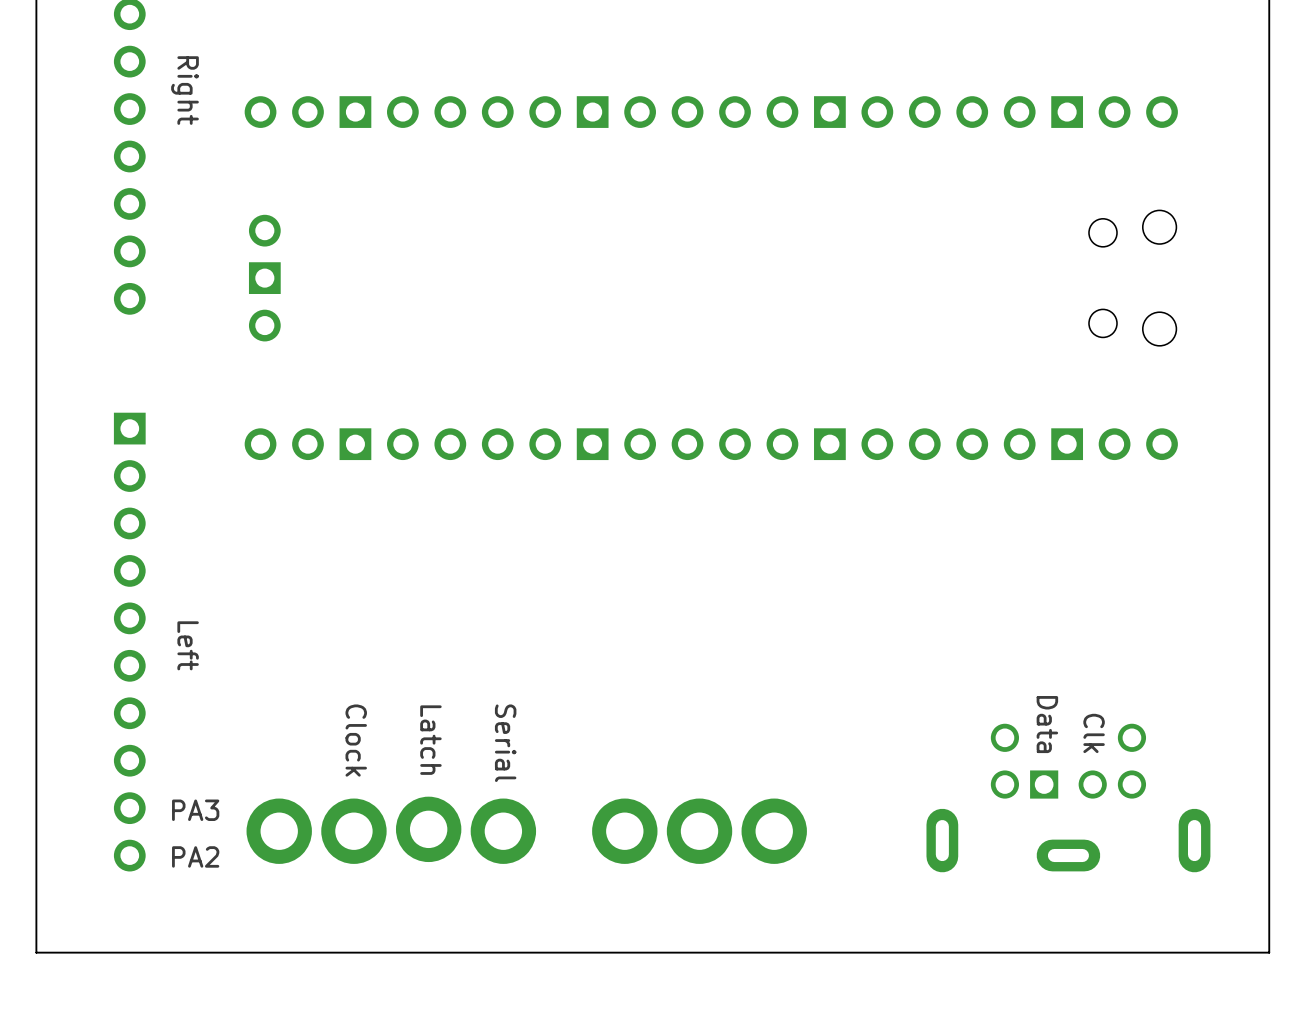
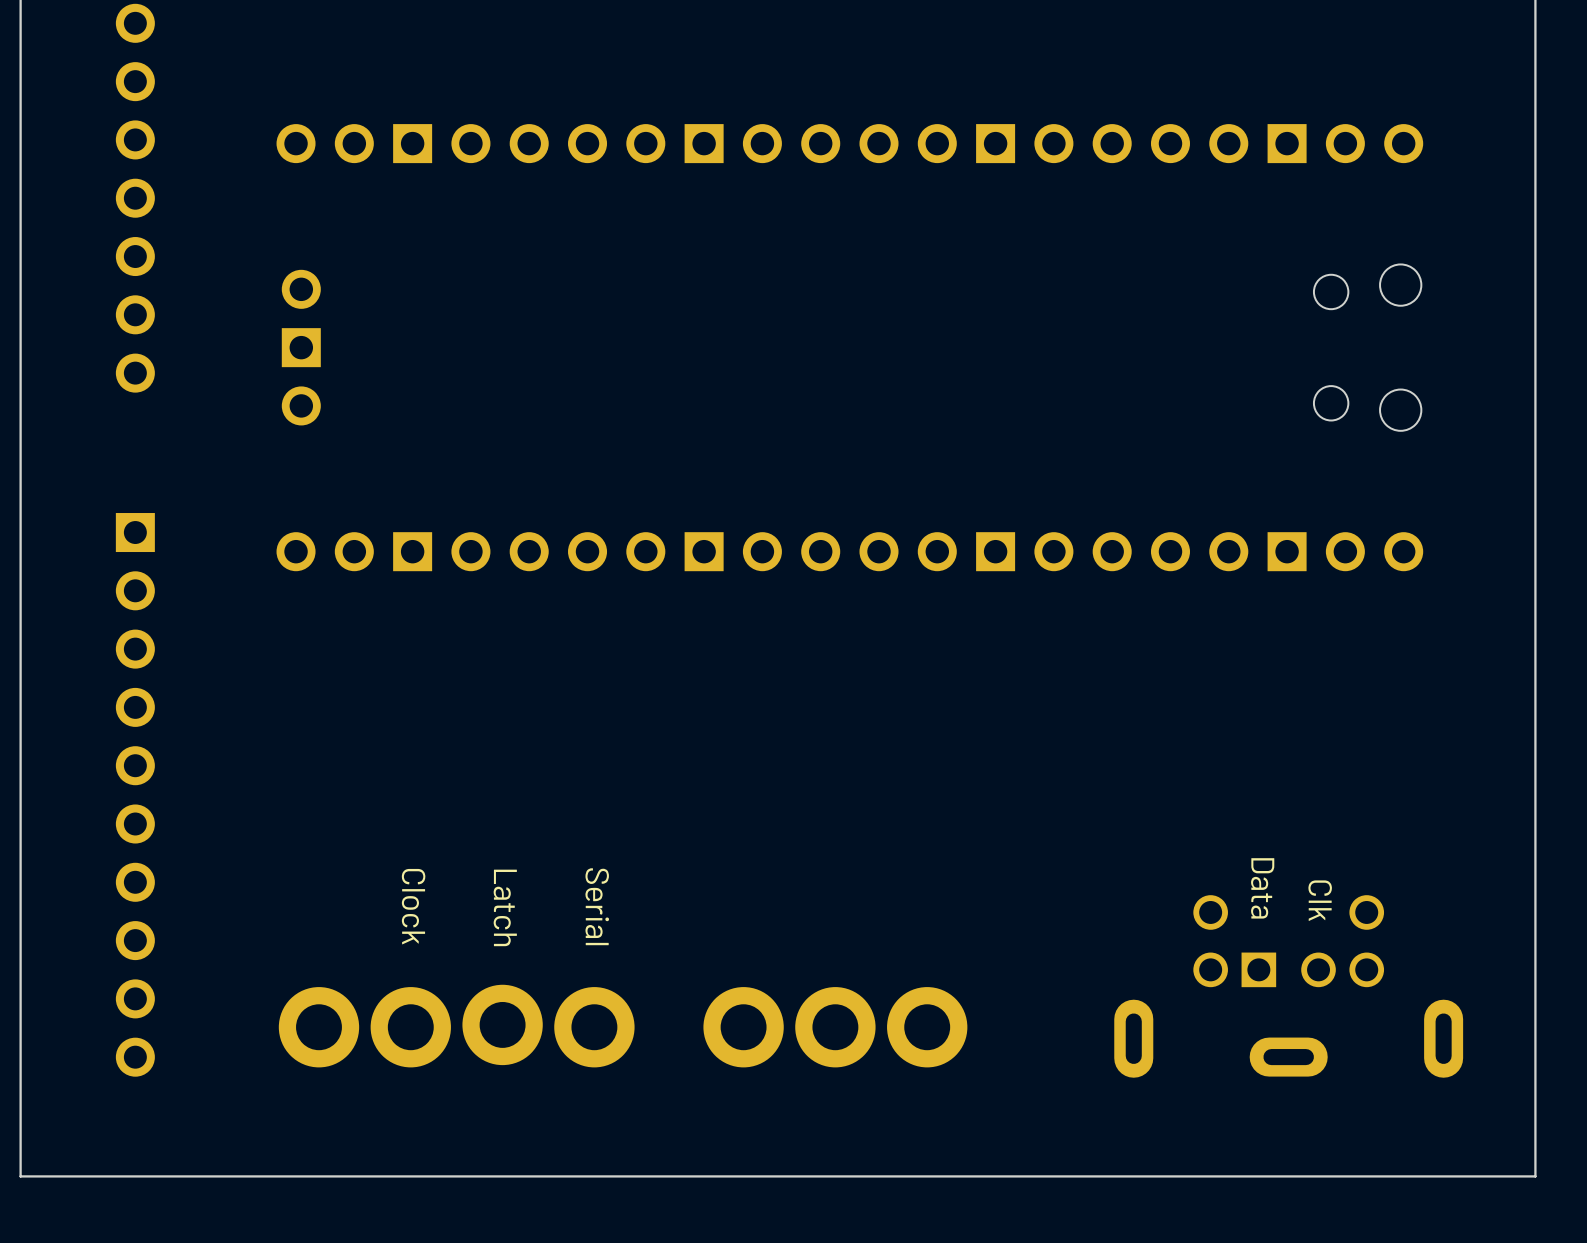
text: Right (184, 90) -> none
text: Left (188, 645) -> none
text: PA3 (195, 810) -> none
text: PA2 (195, 856) -> none

